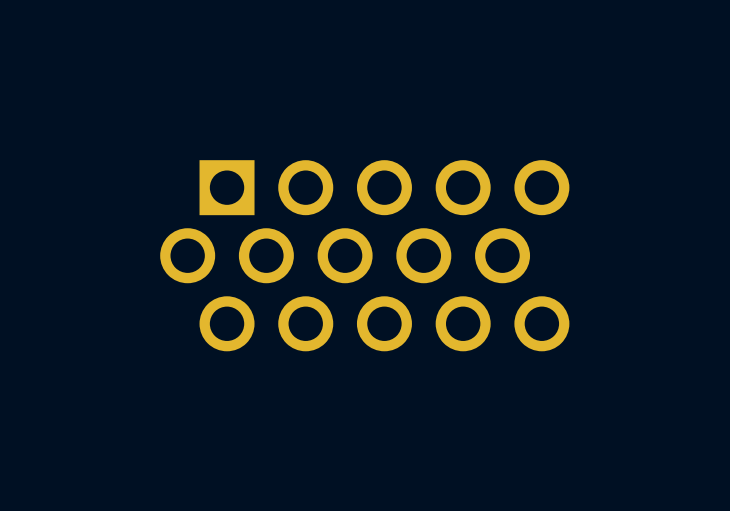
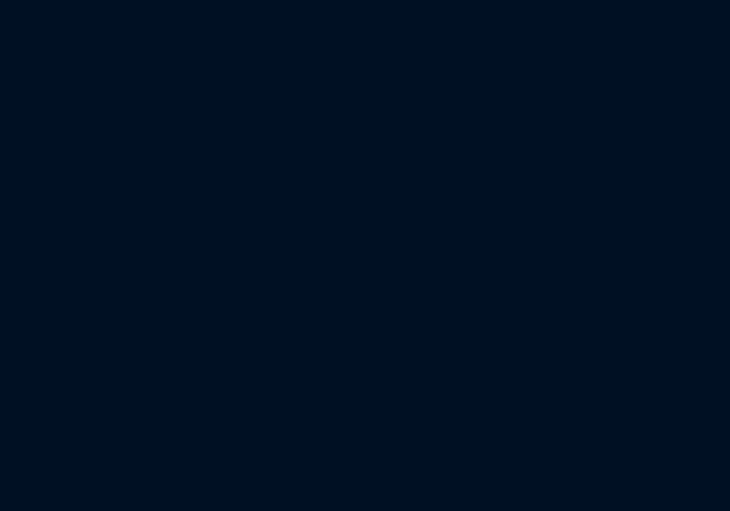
part: (364, 255) -> none

